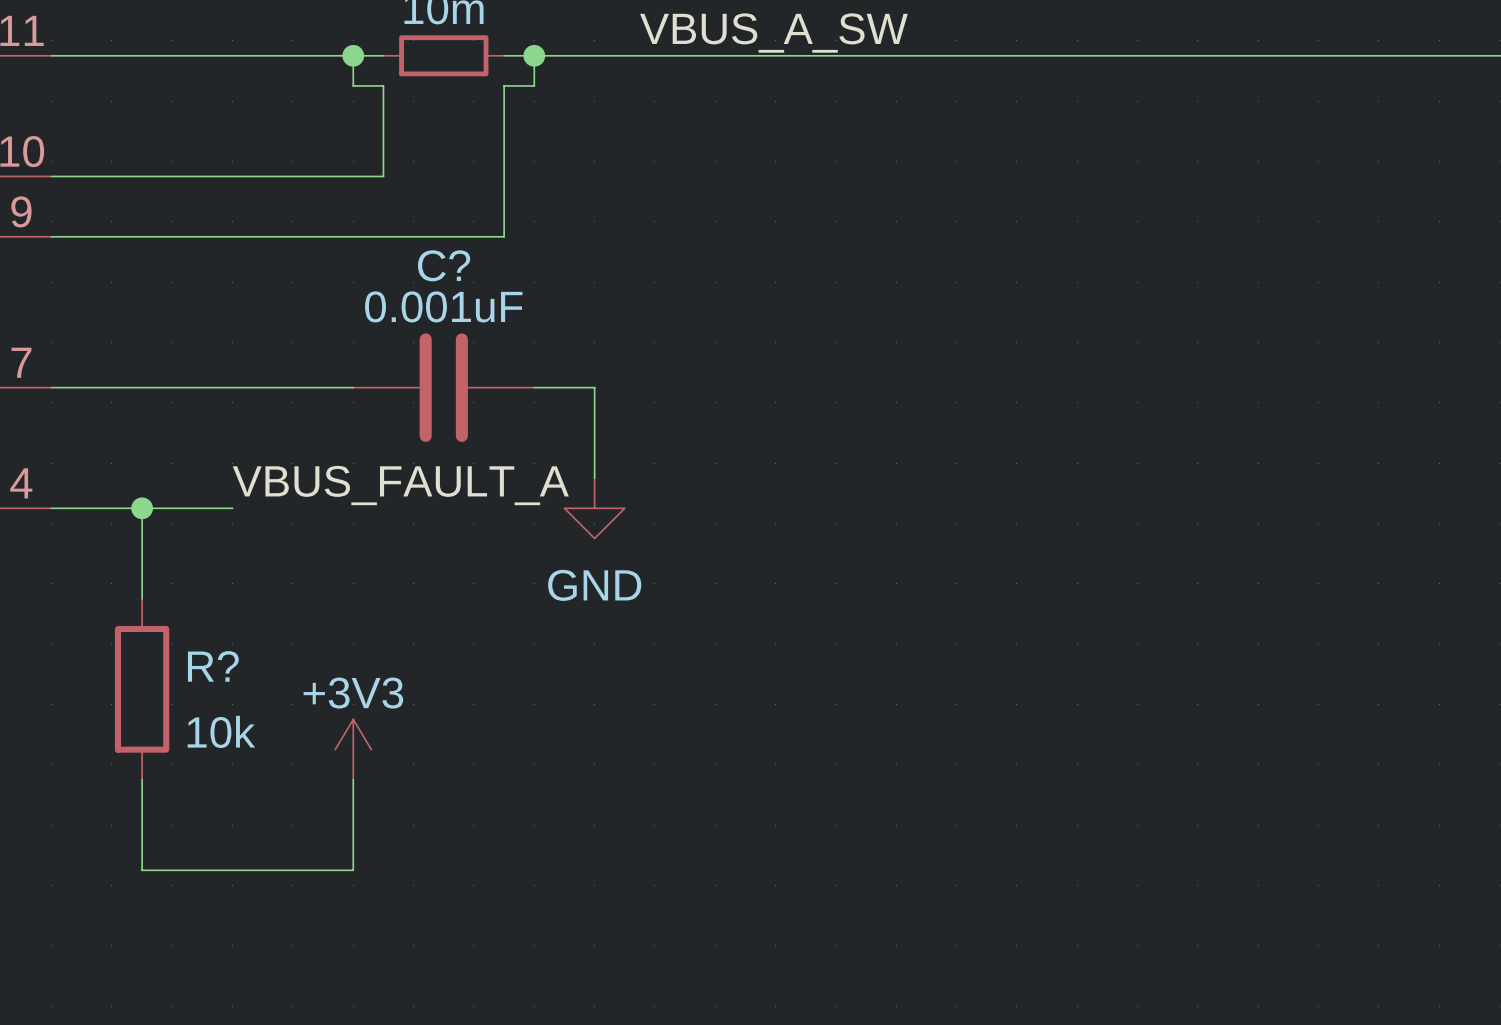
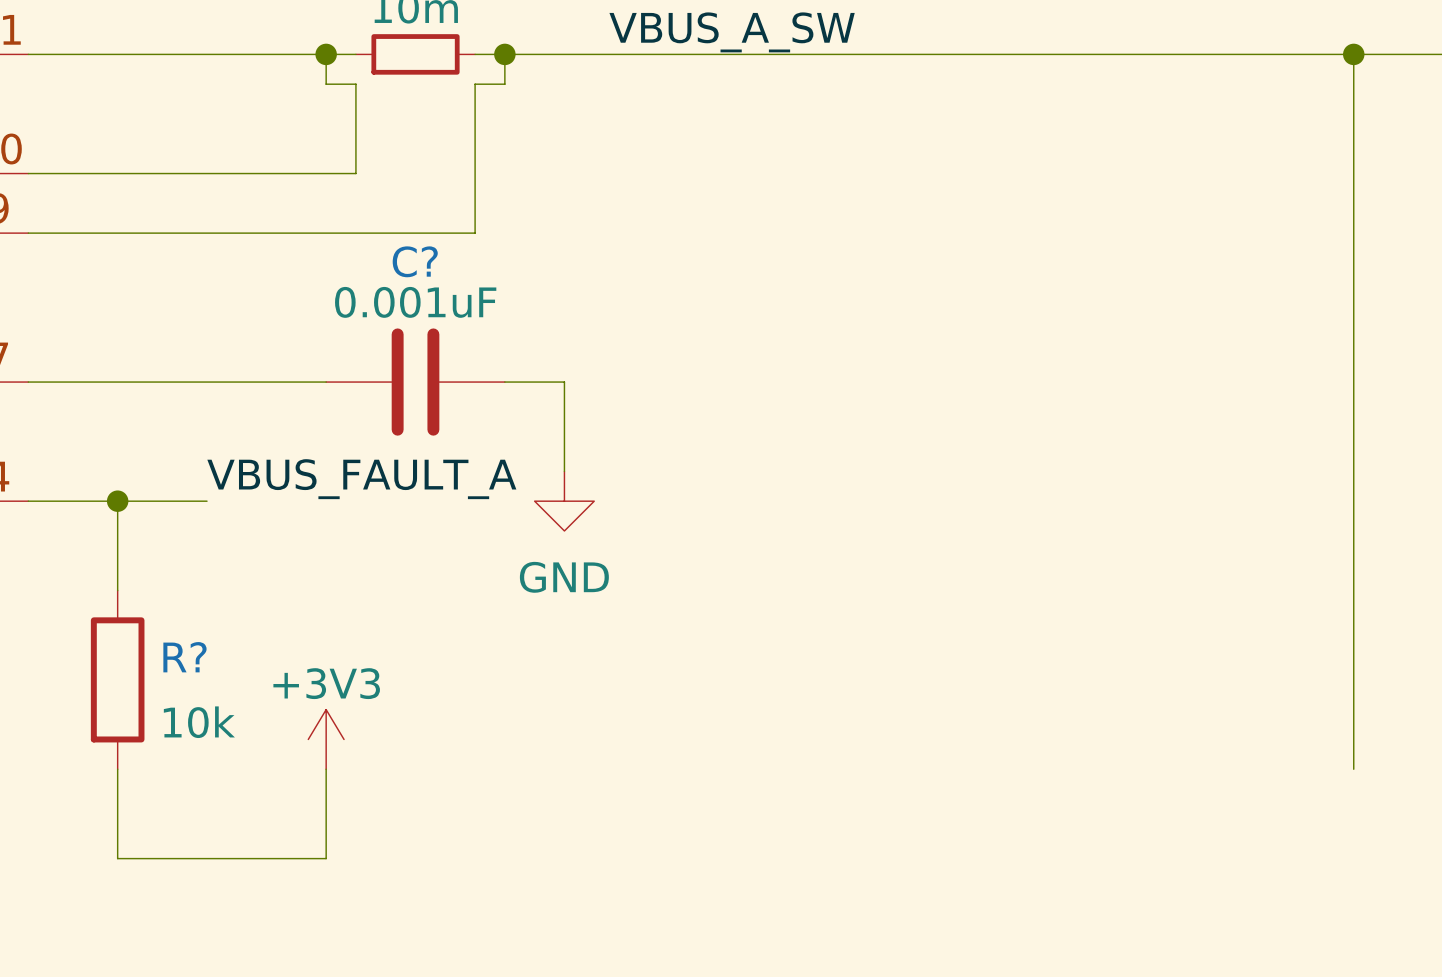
wire: none -> (1353, 54) (1353, 769)
junction: none -> (1353, 54)

